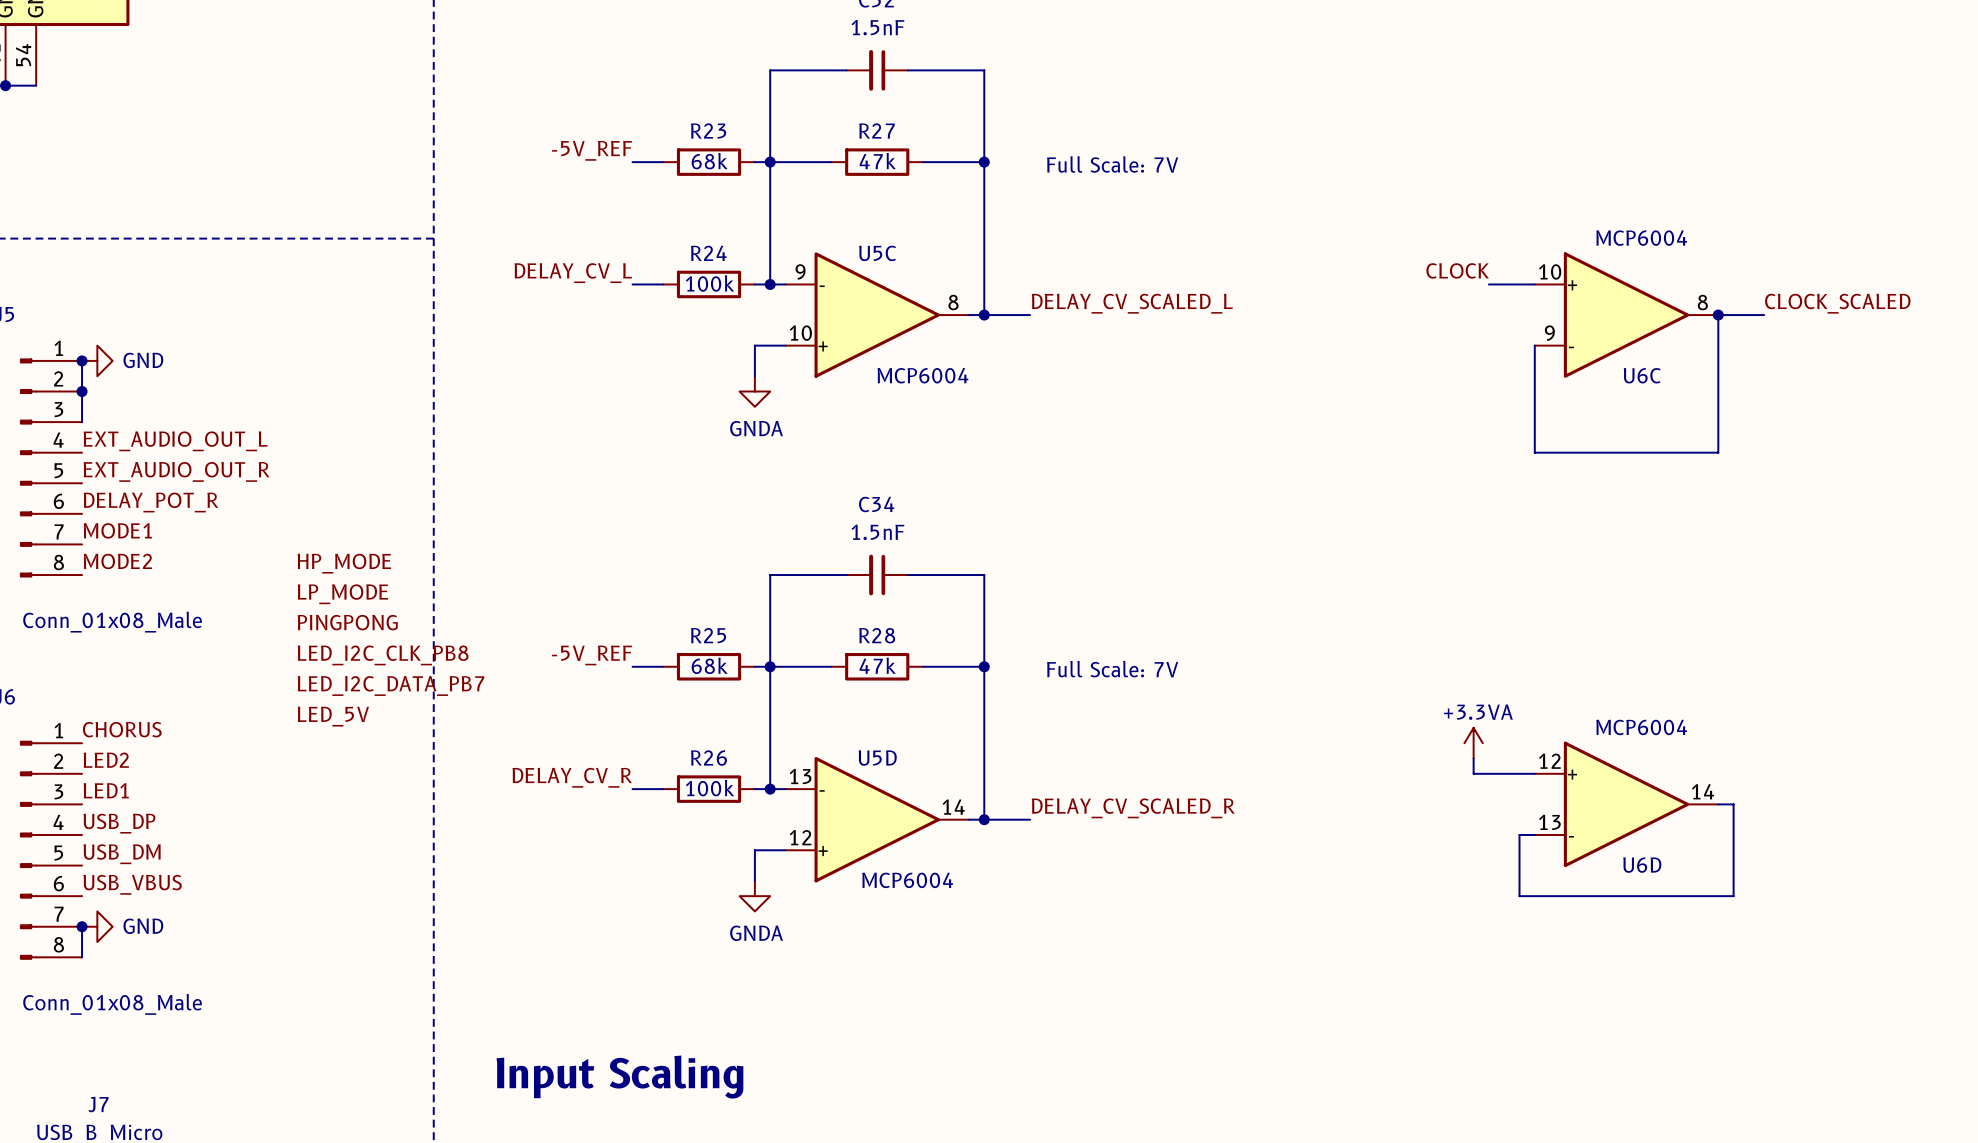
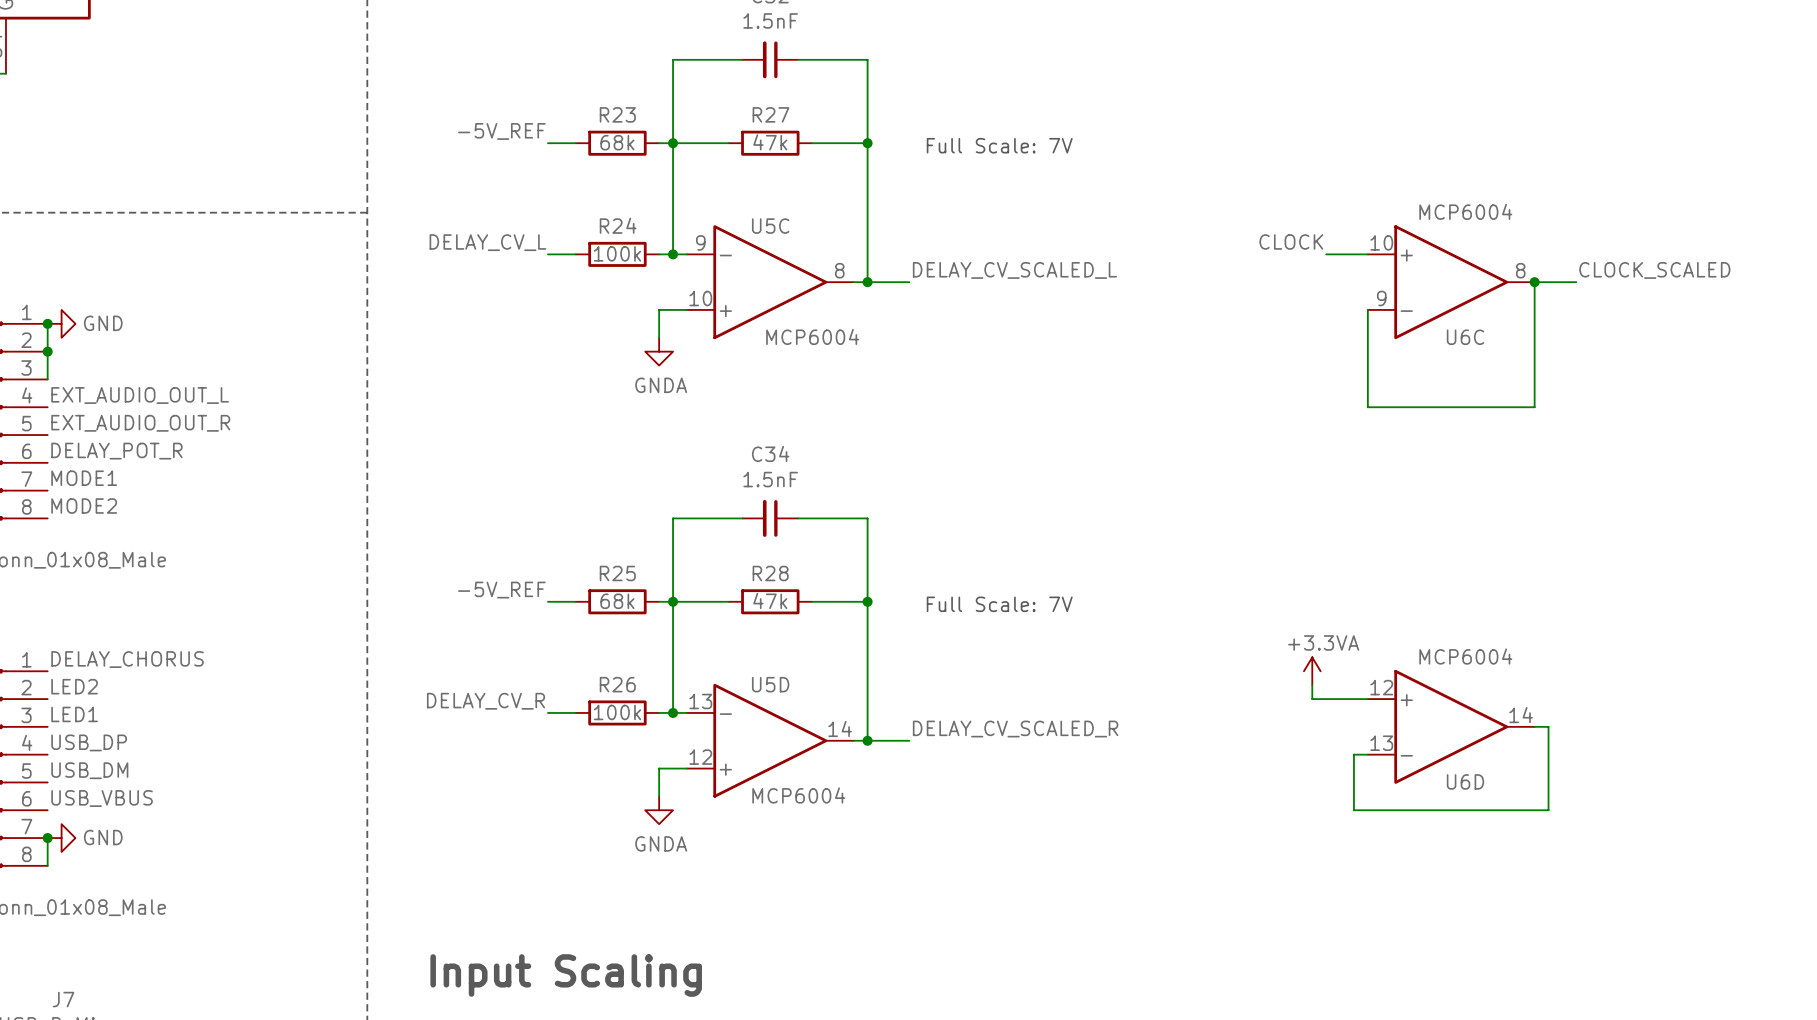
label: HP_MODE (344, 563) -> none
label: LP_MODE (342, 594) -> none
label: PINGPONG (347, 622) -> none
label: LED_I2C_CLK_PB8 (383, 655) -> none
label: LED_I2C_DATA_PB7 (391, 686) -> none
label: LED_5V (333, 716) -> none
label: CHORUS (122, 729) -> DELAY_CHORUS (127, 659)

